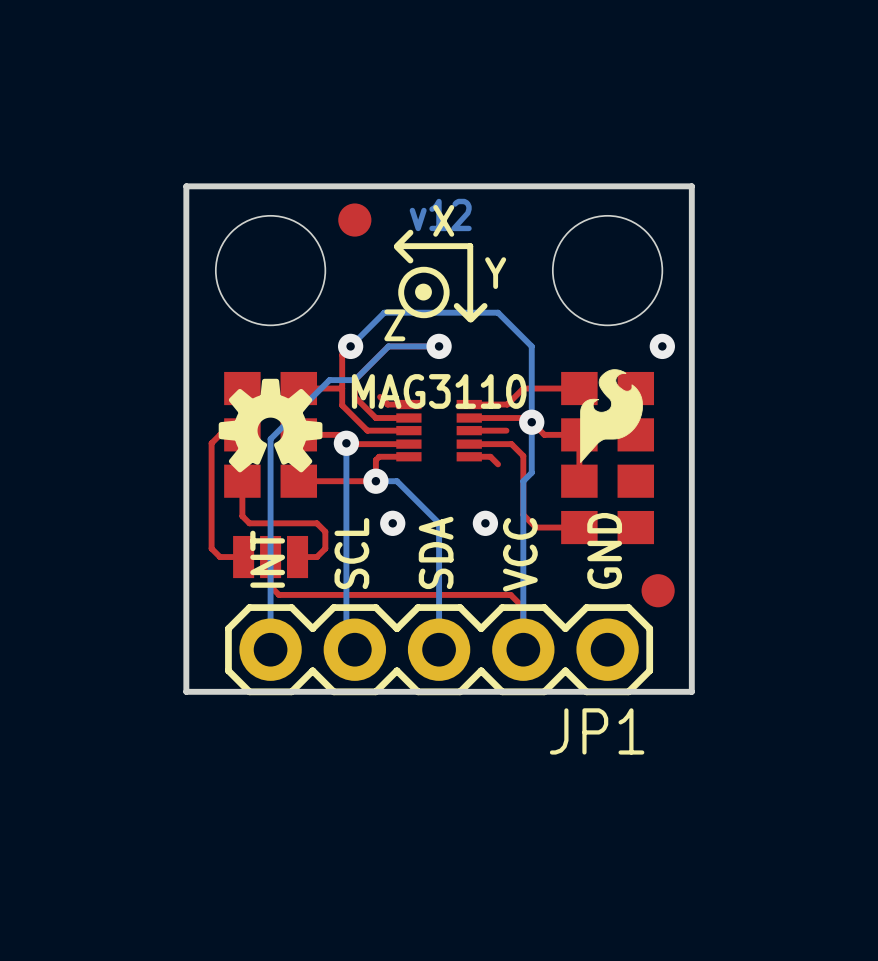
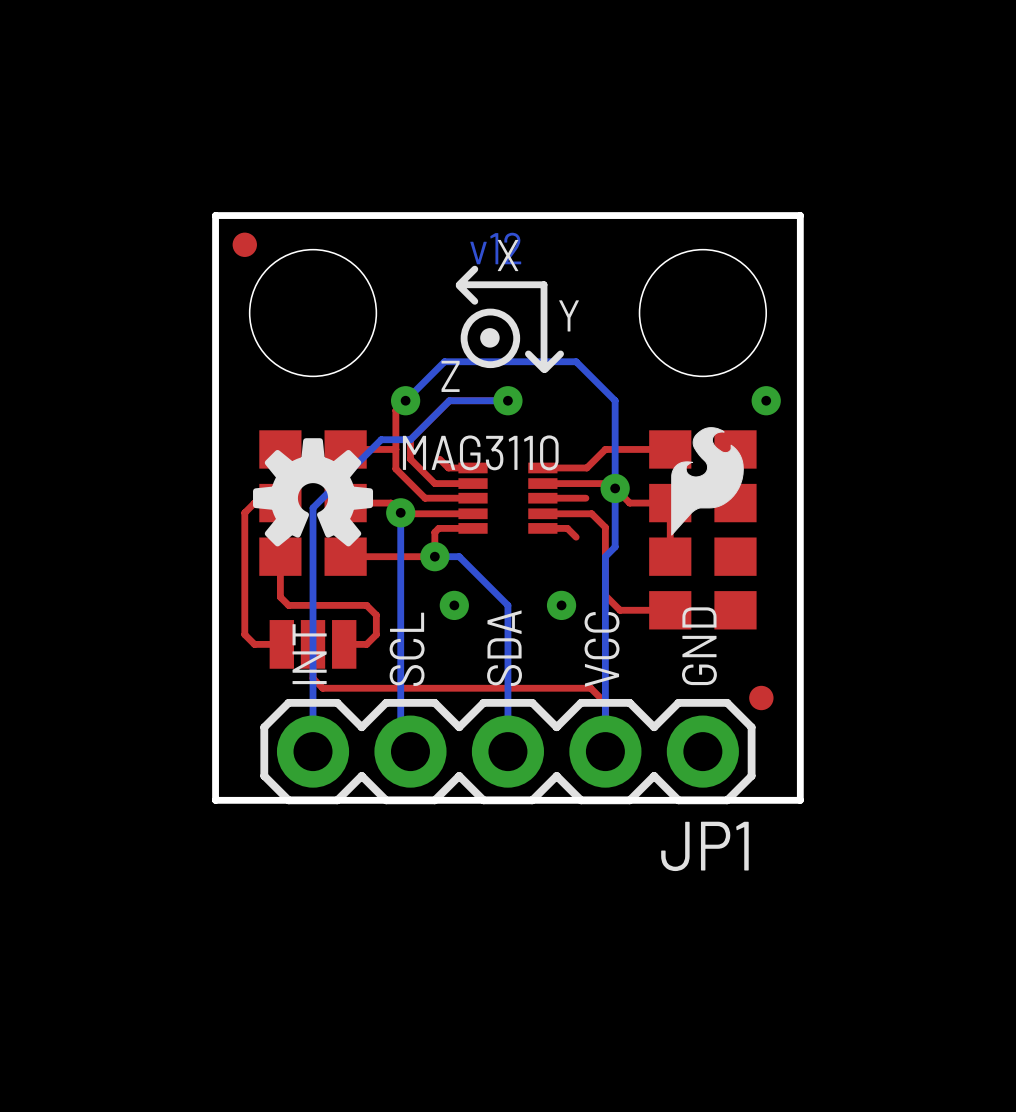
part: none -> (244, 244)
part: (354, 220) -> none
part footprint: [641, 574, 675, 608] -> [749, 685, 774, 711]

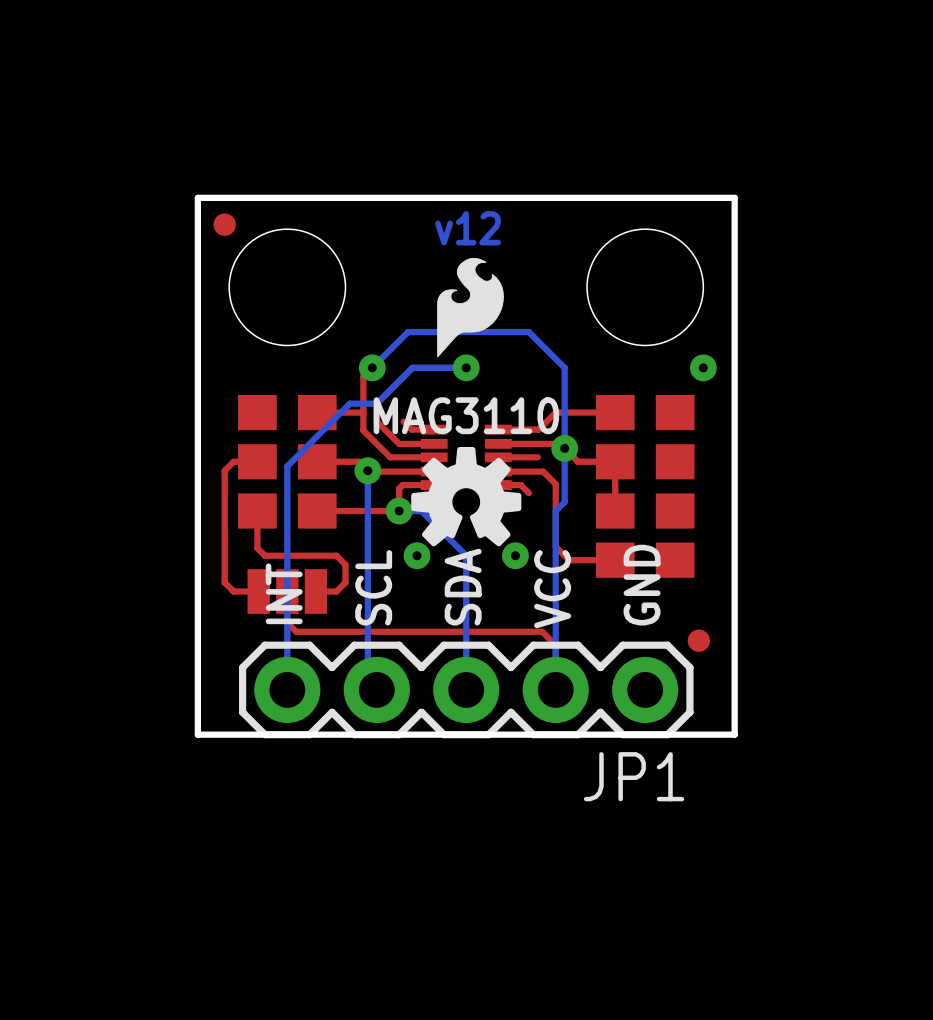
text: X (508, 255) -> none
line: (474, 269) (459, 284) -> none
line: (460, 284) (544, 284) (544, 368) -> none
line: (459, 285) (474, 301) -> none
drawing: [460, 308, 521, 369] -> none
text: Y (569, 315) -> none
line: (528, 353) (544, 369) -> none
line: (560, 353) (544, 369) -> none
text: Z (450, 376) -> none
drawing position: (707, 481) -> (470, 307)
drawing position: (313, 492) -> (466, 496)

